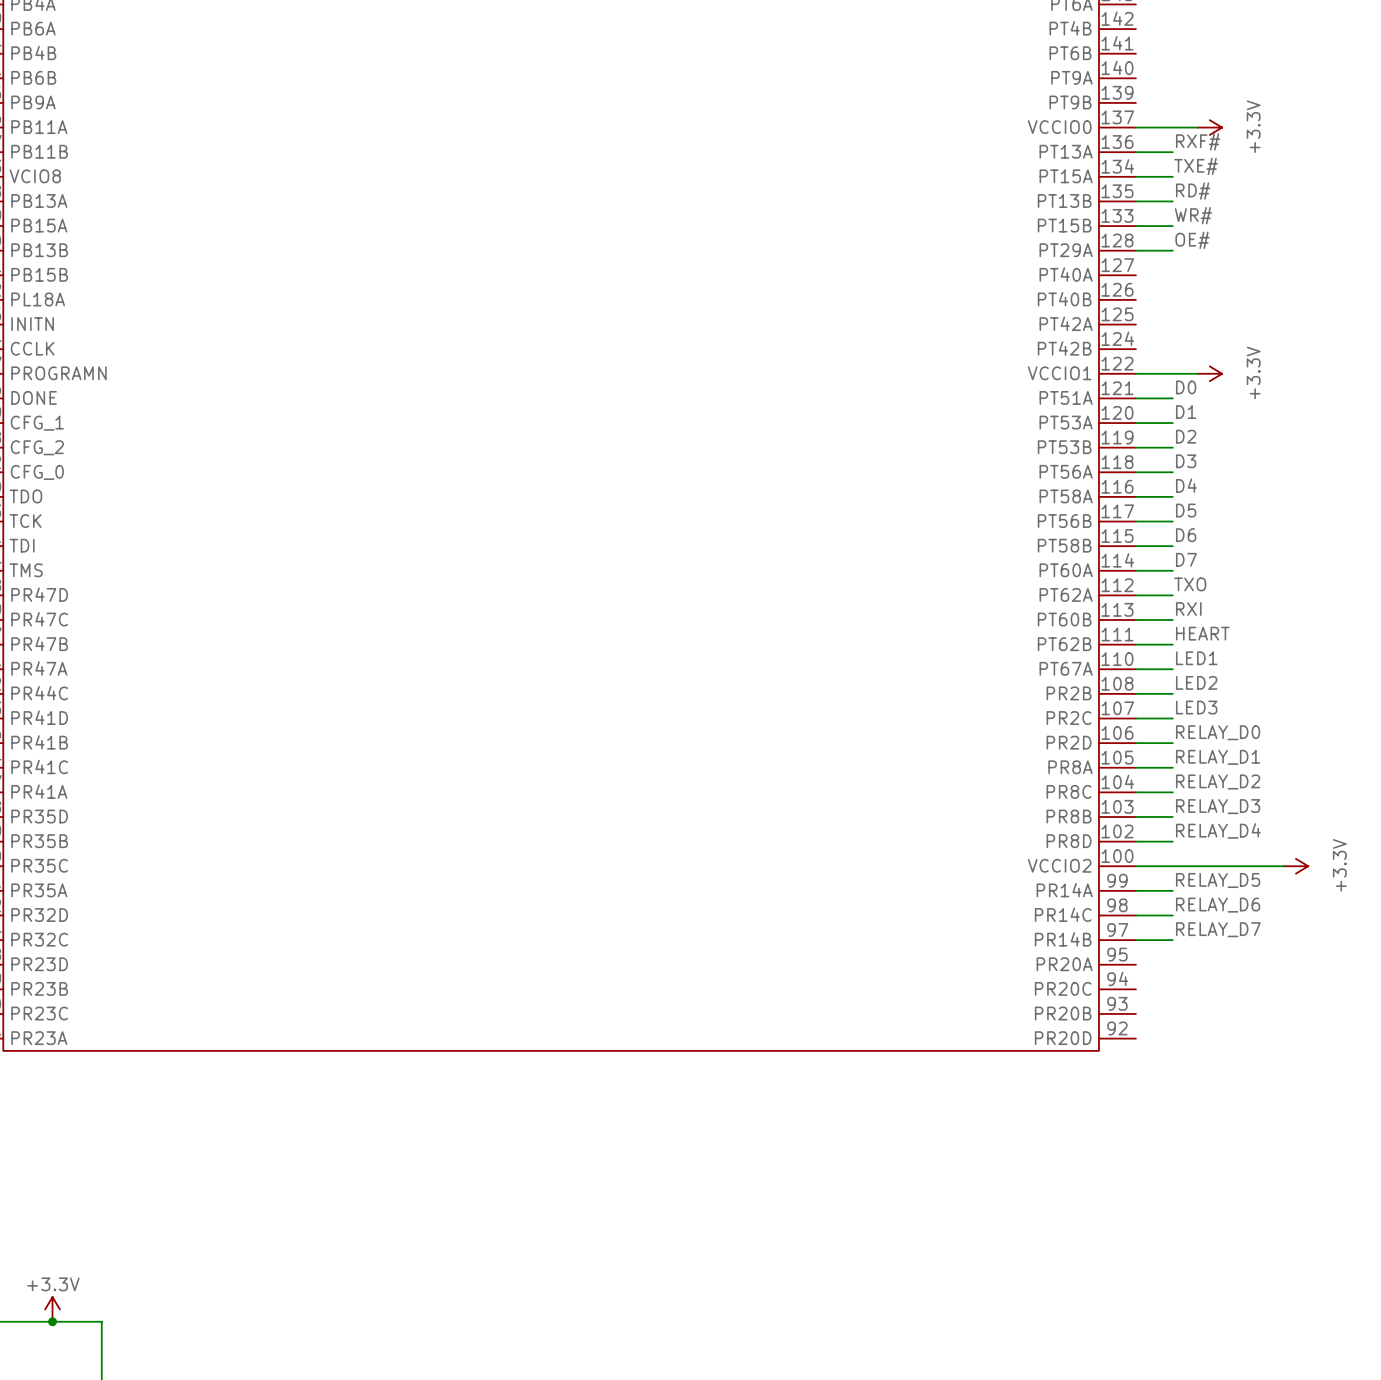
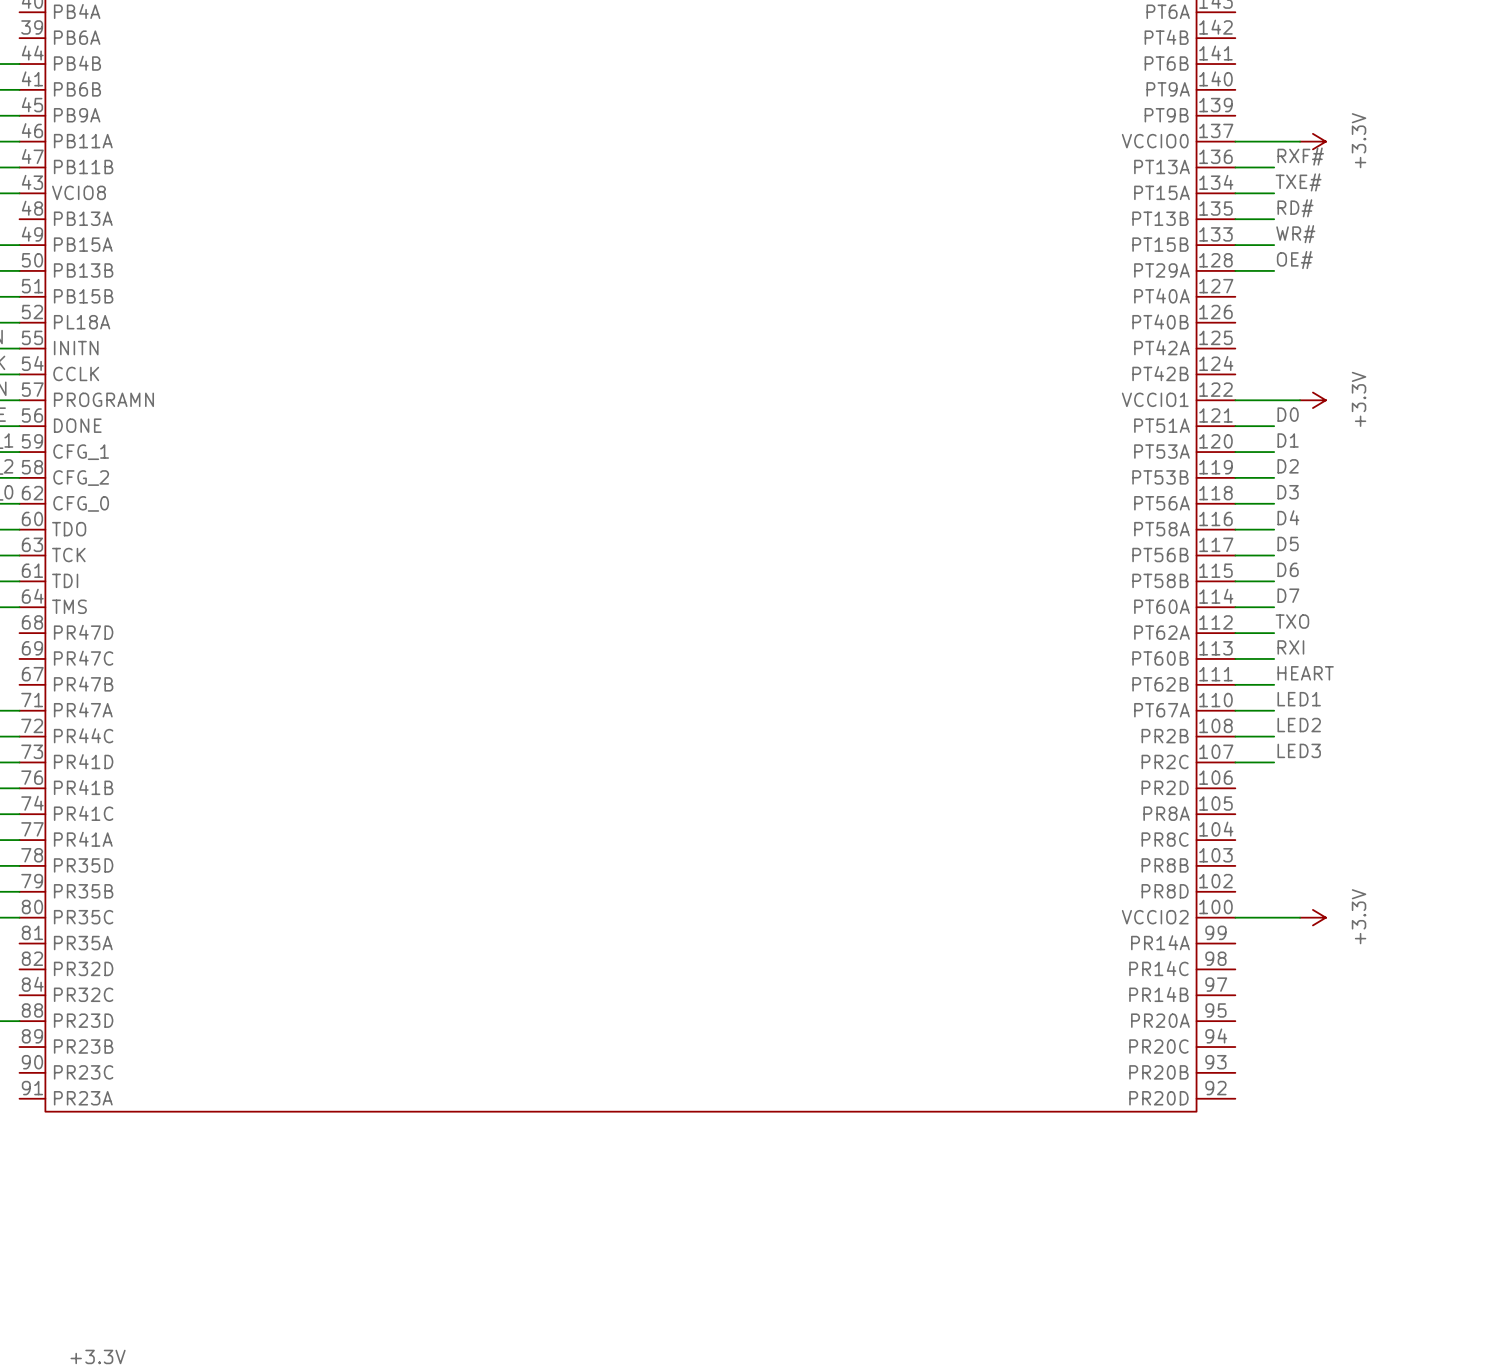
label: RELAY_D0 (1218, 732) -> none
wire: (1135, 743) (1172, 743) -> none
label: RELAY_D1 (1218, 757) -> none
wire: (1135, 767) (1172, 767) -> none
label: RELAY_D2 (1218, 781) -> none
wire: (1135, 792) (1172, 792) -> none
label: RELAY_D3 (1218, 806) -> none
wire: (1135, 817) (1172, 817) -> none
label: RELAY_D4 (1218, 830) -> none
wire: (1135, 841) (1172, 841) -> none
wire: (1197, 866) (1283, 866) -> none
power symbol position: +3.3V (1295, 866) -> +3.3V (1312, 917)
label: RELAY_D5 (1218, 880) -> none
wire: (1135, 890) (1172, 890) -> none
label: RELAY_D6 (1218, 905) -> none
wire: (1135, 915) (1172, 915) -> none
label: RELAY_D7 (1218, 929) -> none
wire: (1135, 940) (1172, 940) -> none

